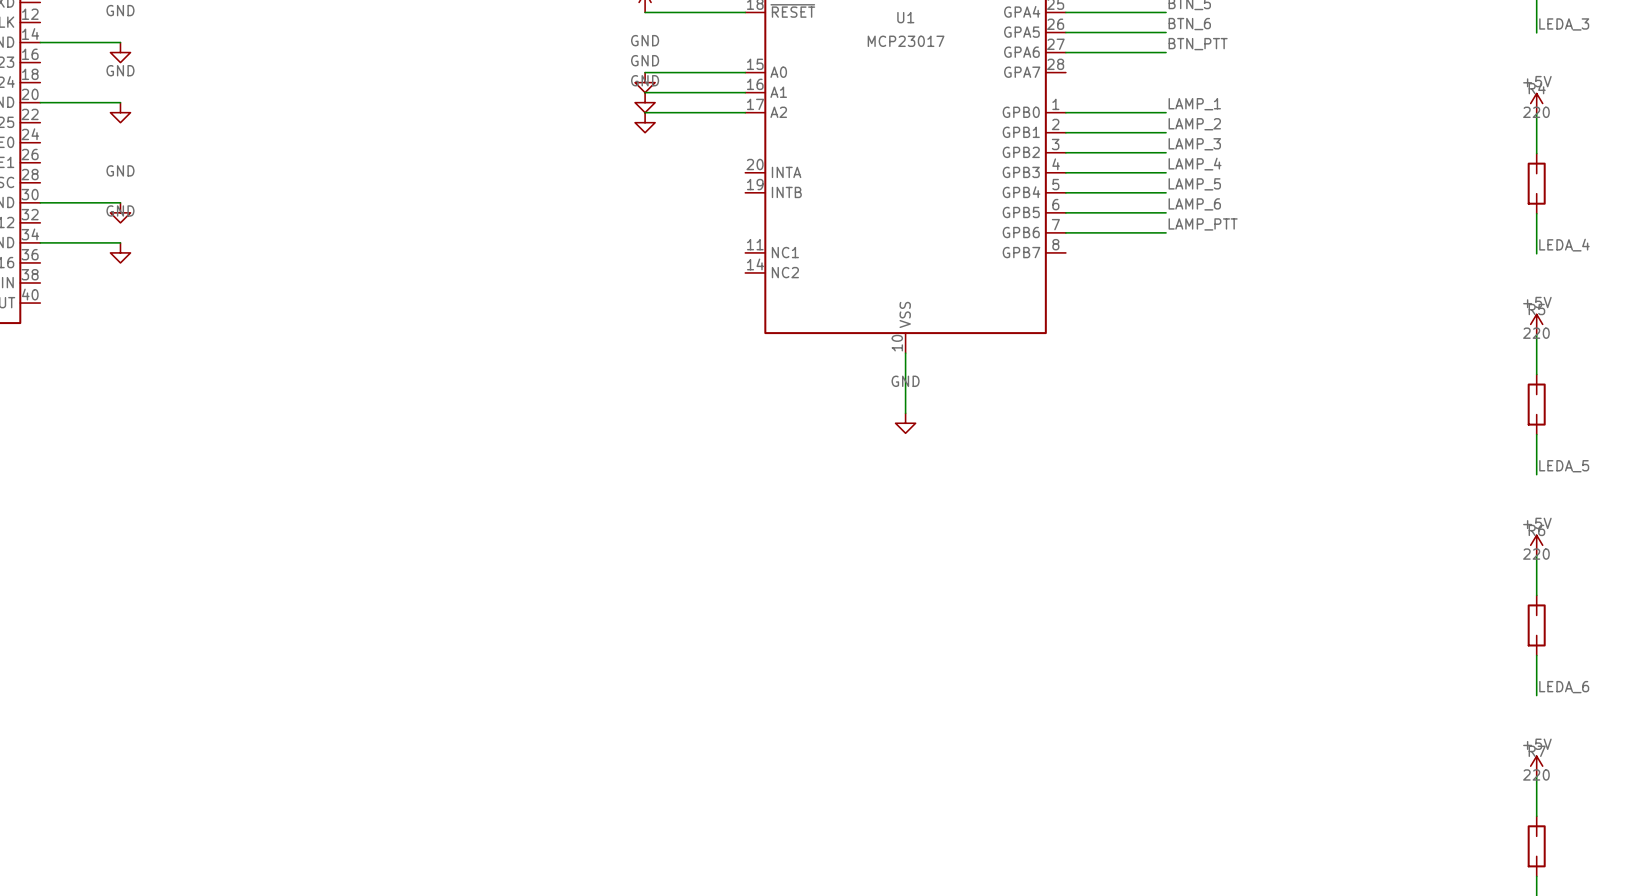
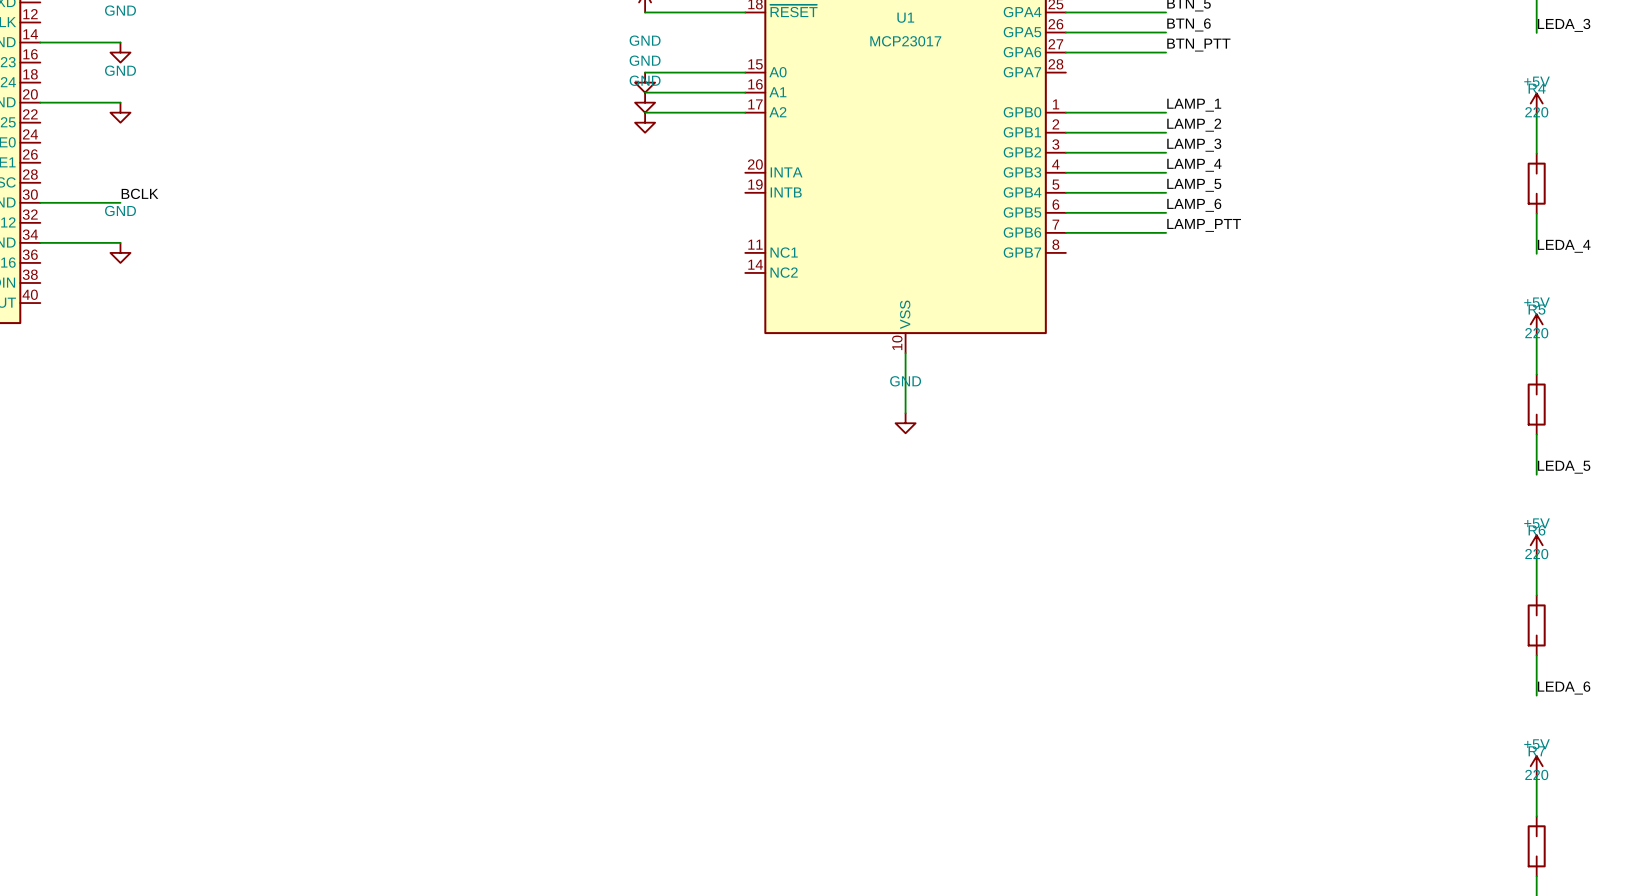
label: none -> BCLK (140, 193)
power symbol: GND (120, 212) -> none

